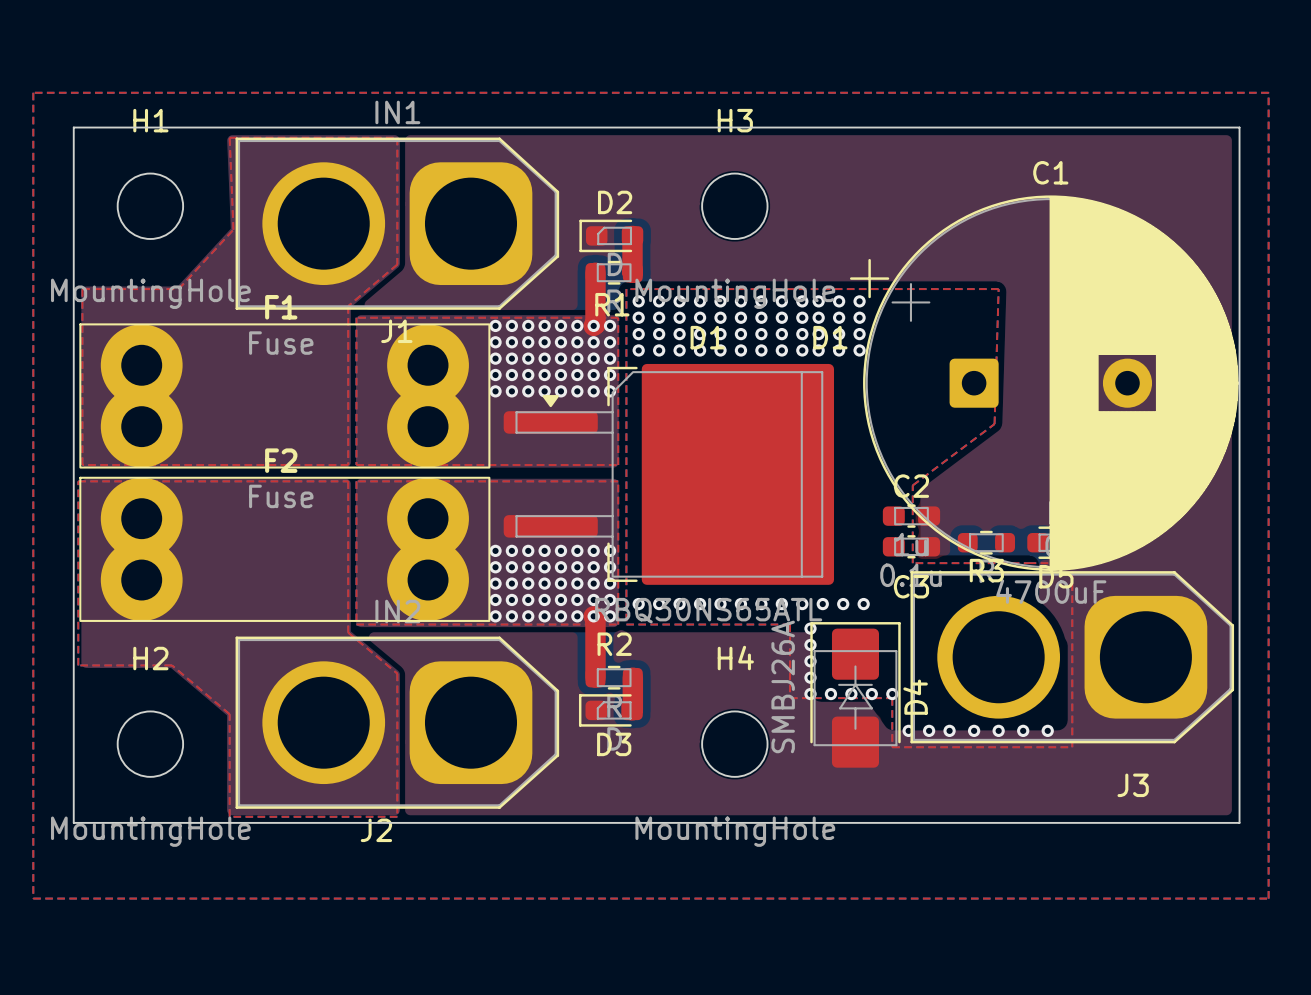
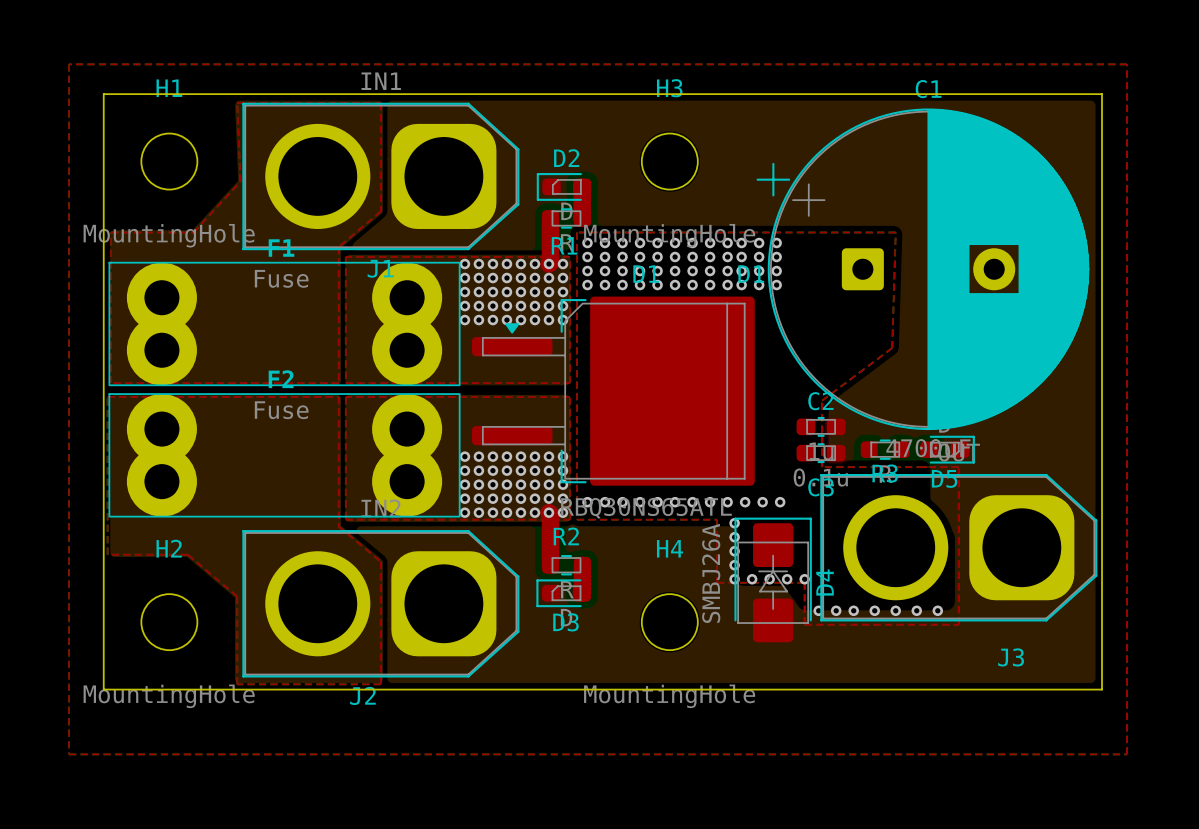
C1 position: (1044, 383) -> (922, 269)

